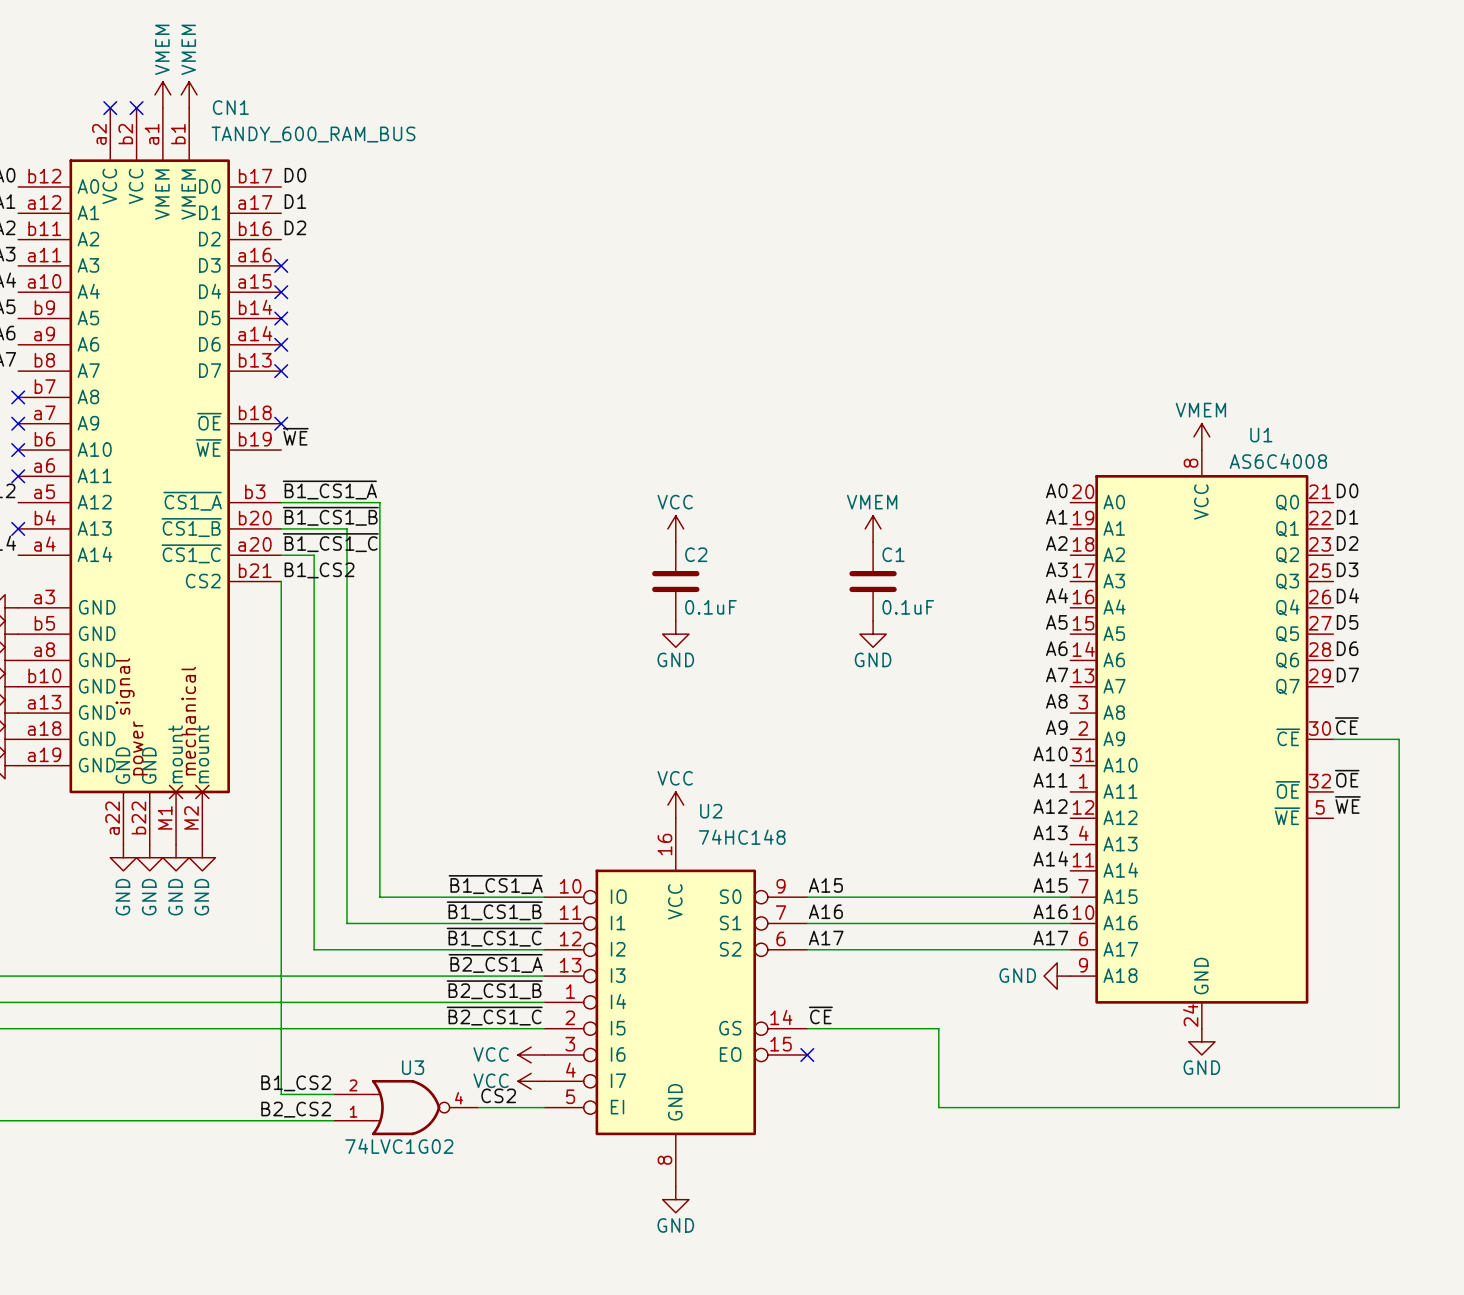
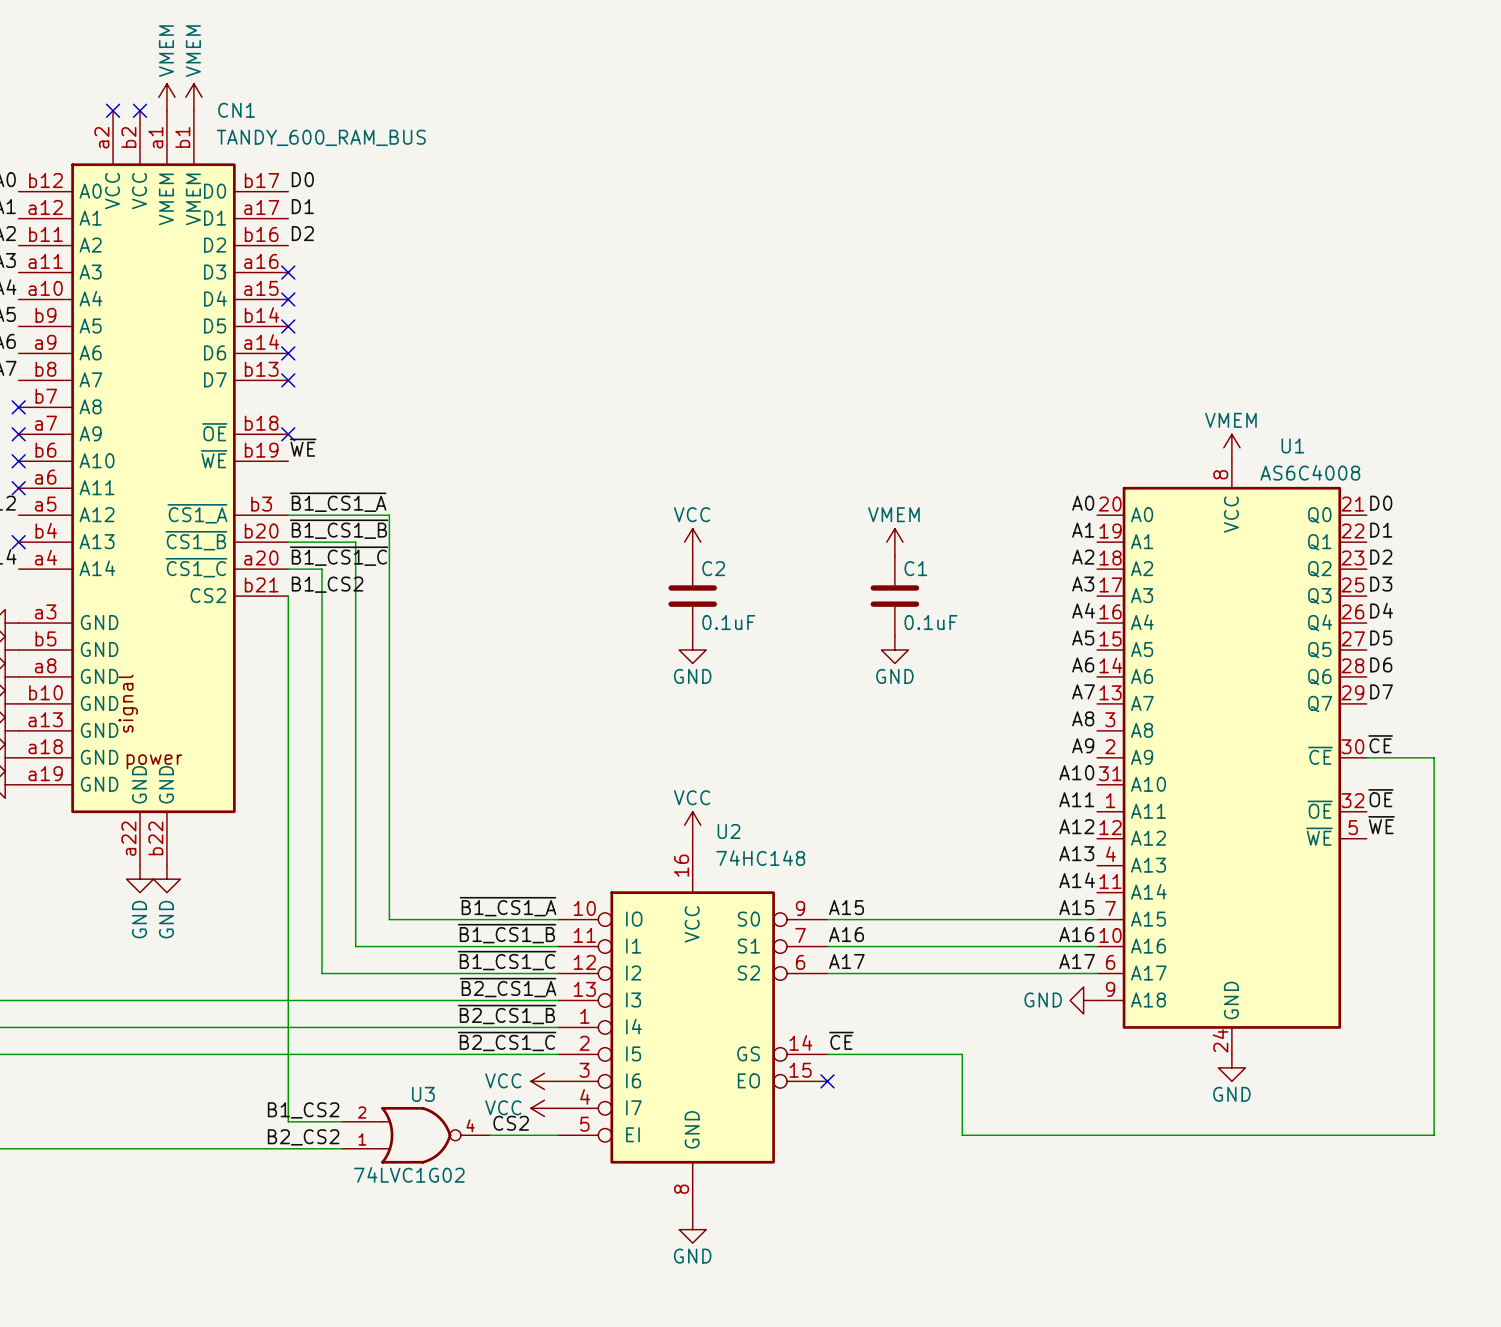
CN1 symbol: [18, 108, 282, 845] -> [18, 110, 289, 866]
power symbol: GND (123, 857) -> none
power symbol: none -> GND (139, 879)
power symbol: GND (149, 857) -> none
power symbol: none -> GND (166, 879)
power symbol: GND (176, 857) -> none
power symbol: GND (202, 857) -> none

